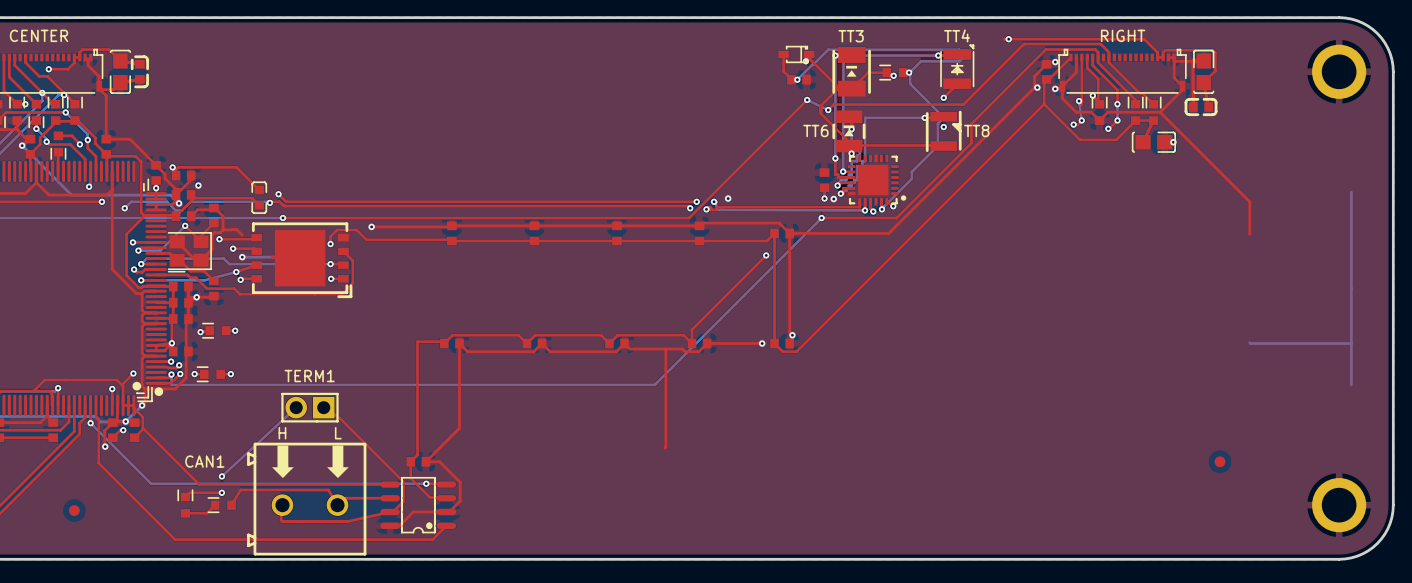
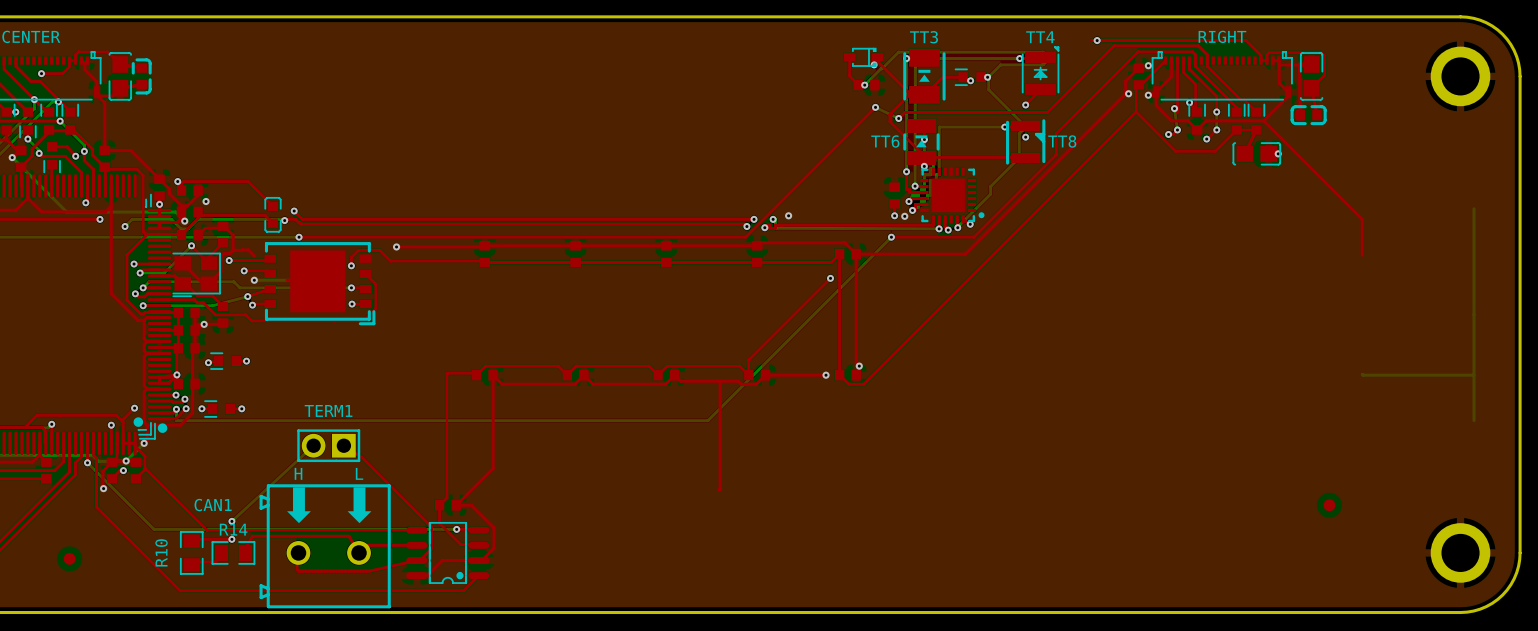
part: (185, 503) -> none
R10: none -> (191, 552)
part: (221, 505) -> none
R14: none -> (233, 552)

